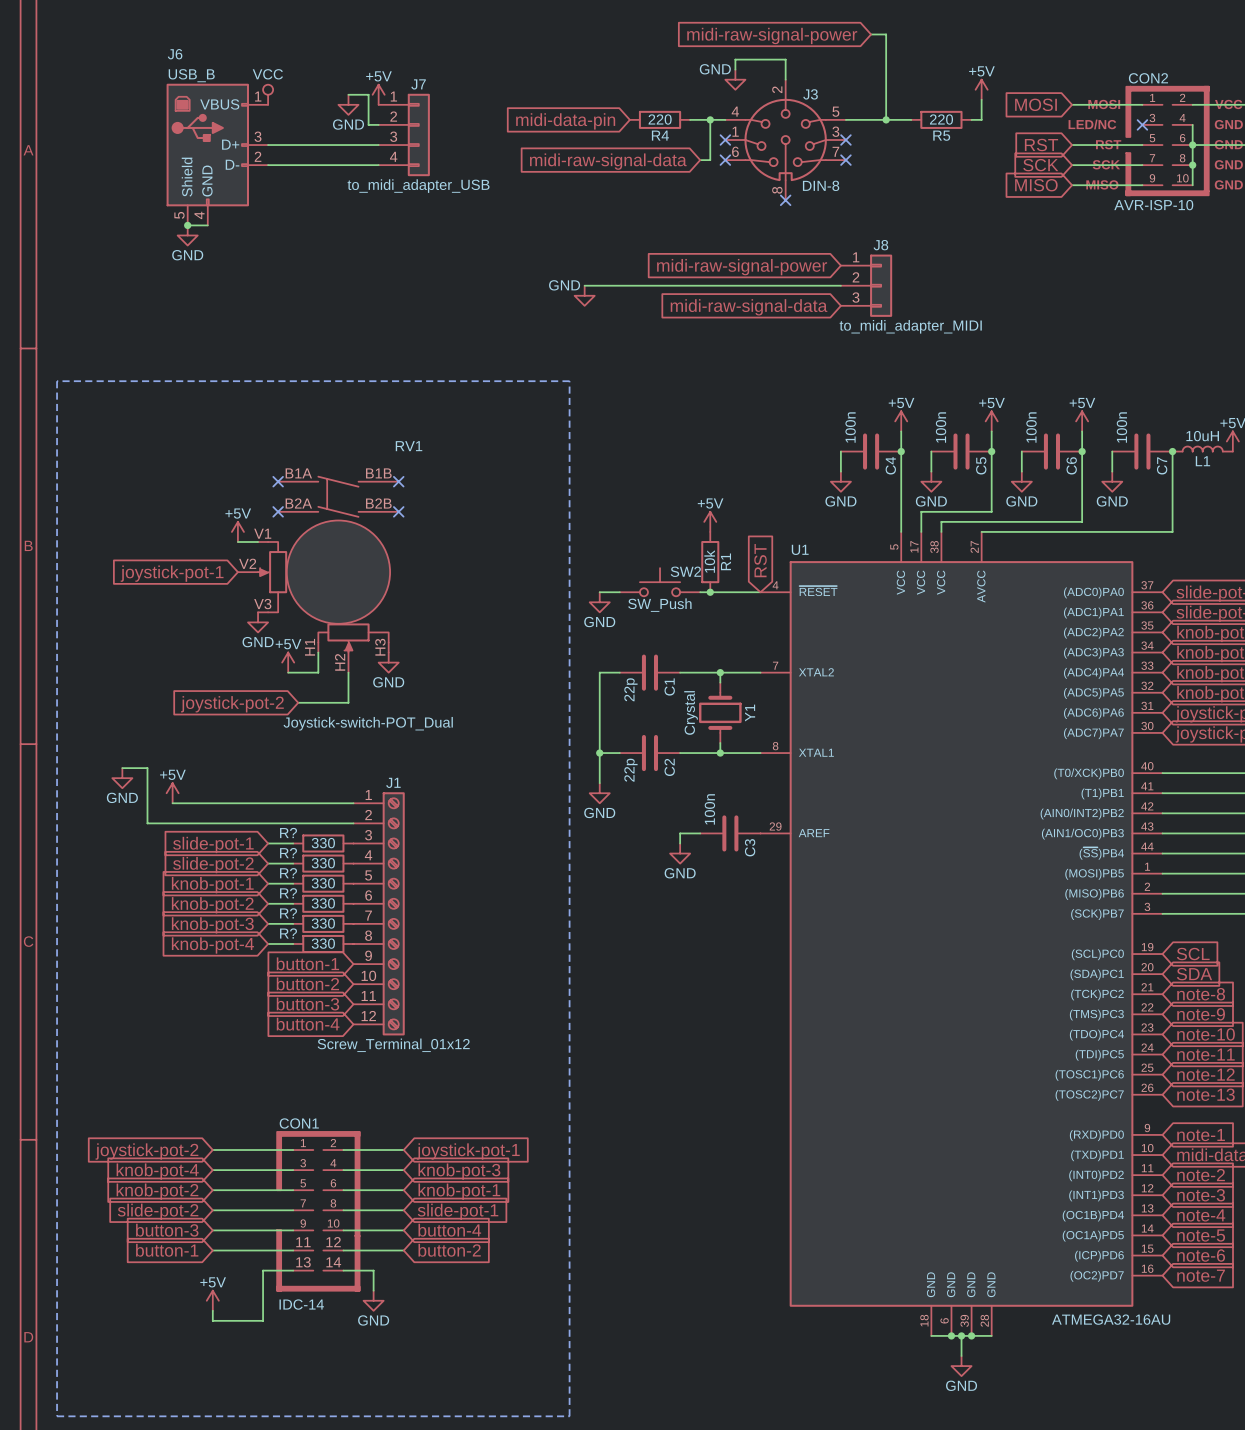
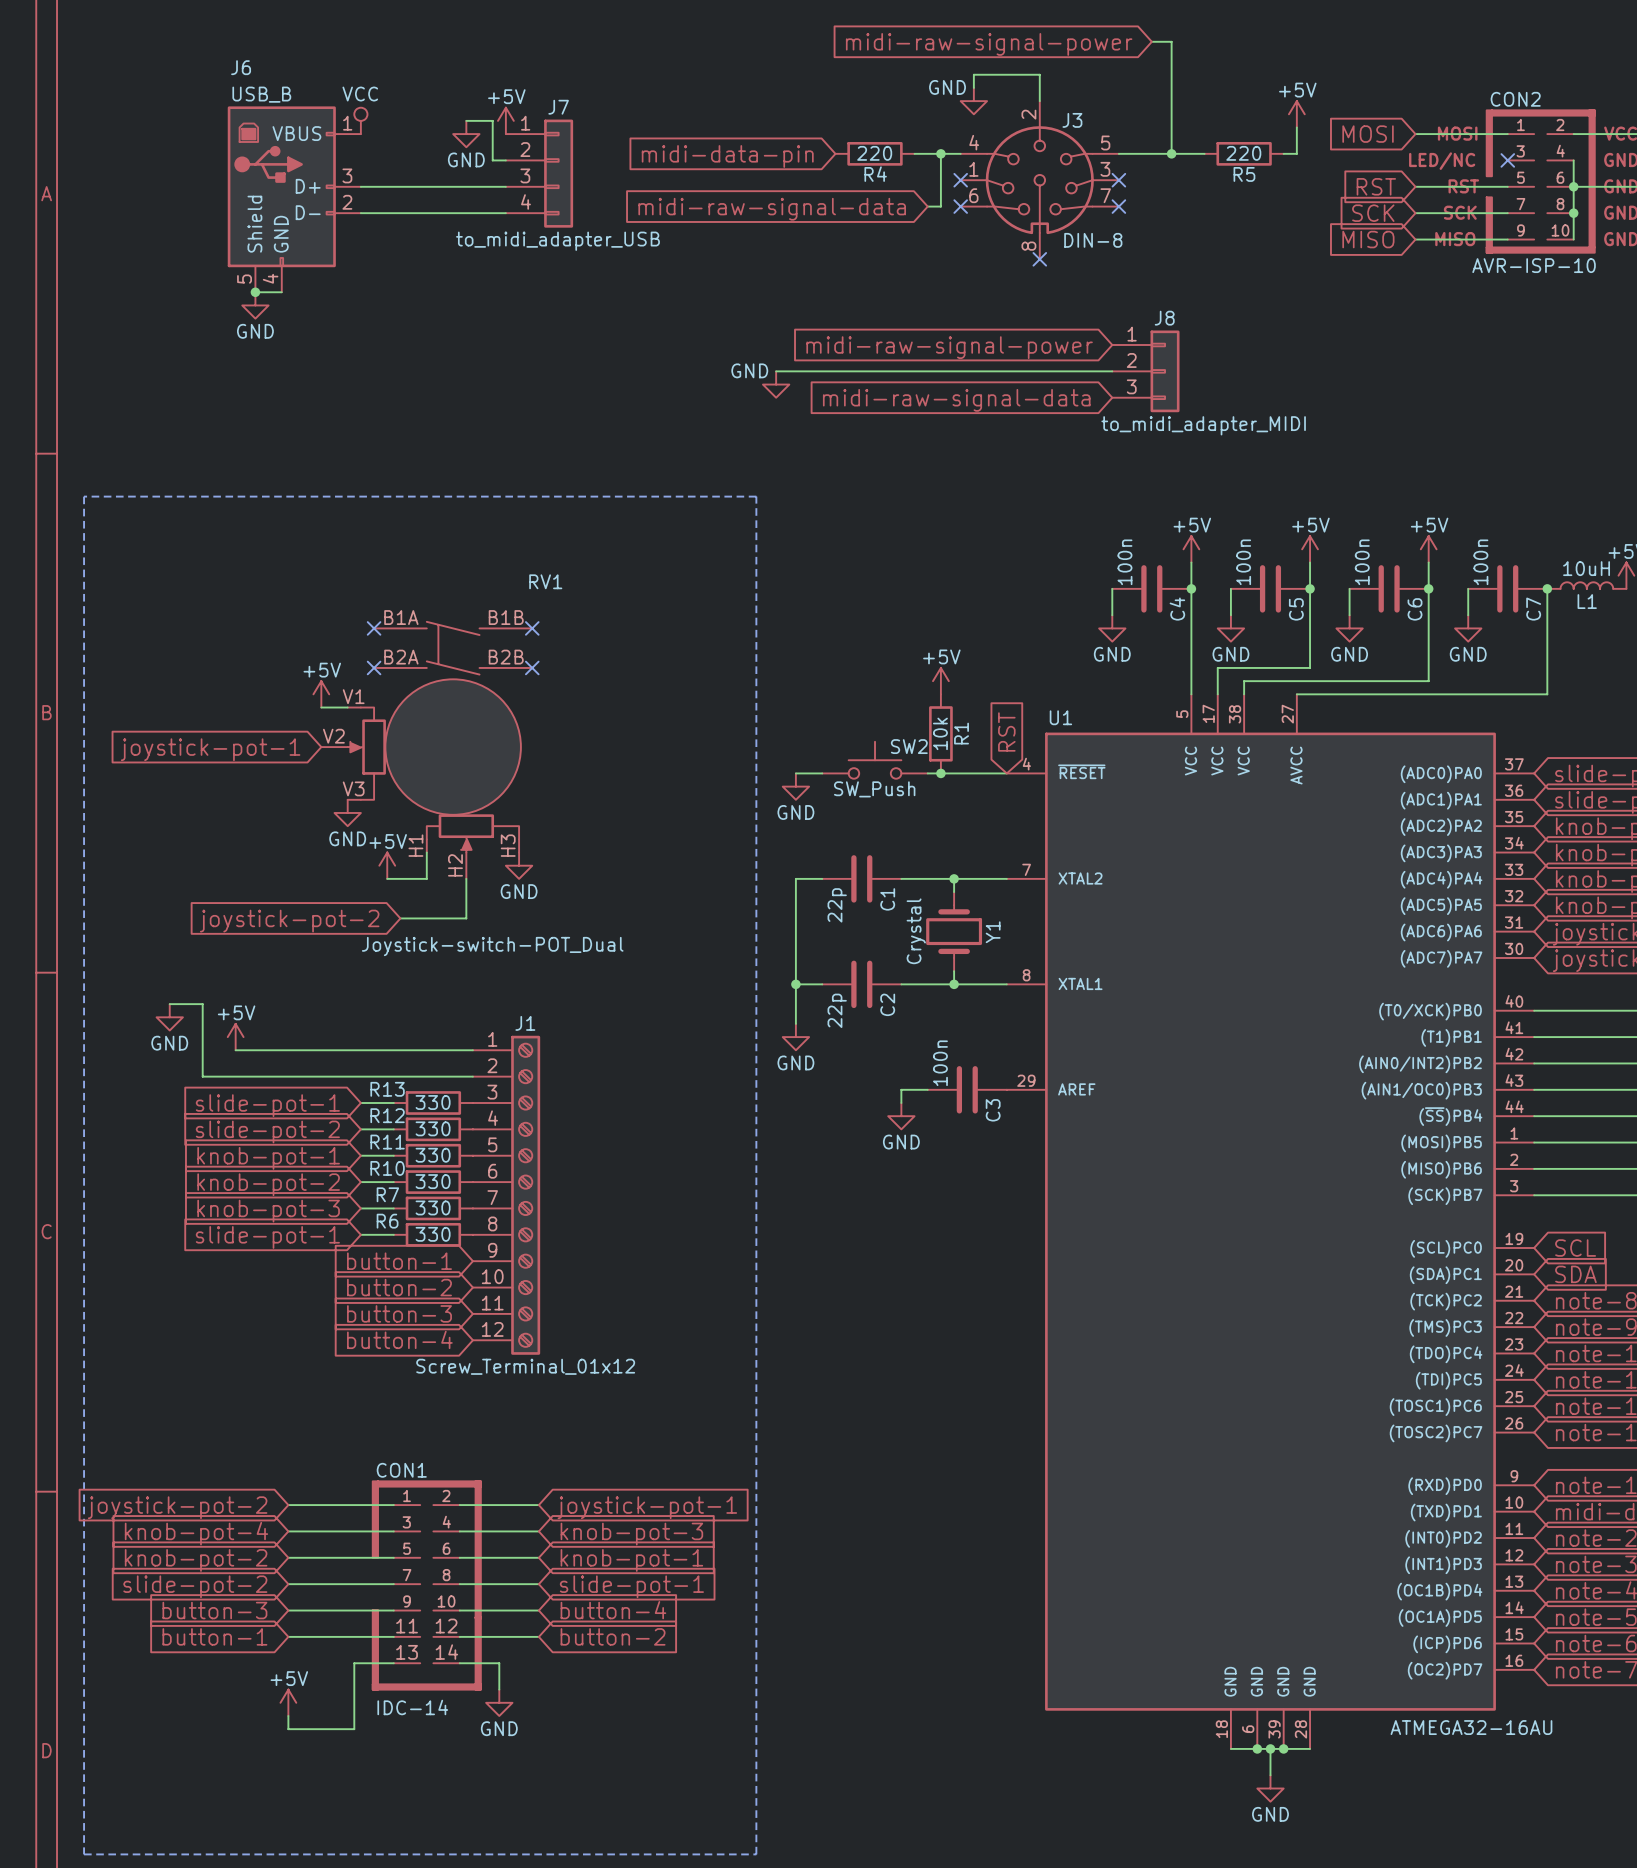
R? name: R? (288, 832) -> R13 (387, 1089)
R? name: R? (288, 853) -> R12 (387, 1115)
R? name: R? (288, 873) -> R11 (387, 1142)
R? name: R? (288, 893) -> R10 (387, 1168)
R? name: R? (288, 913) -> R7 (387, 1194)
R? name: R? (288, 933) -> R6 (387, 1221)
global label: knob-pot-4 (212, 945) -> slide-pot-1 (267, 1237)

